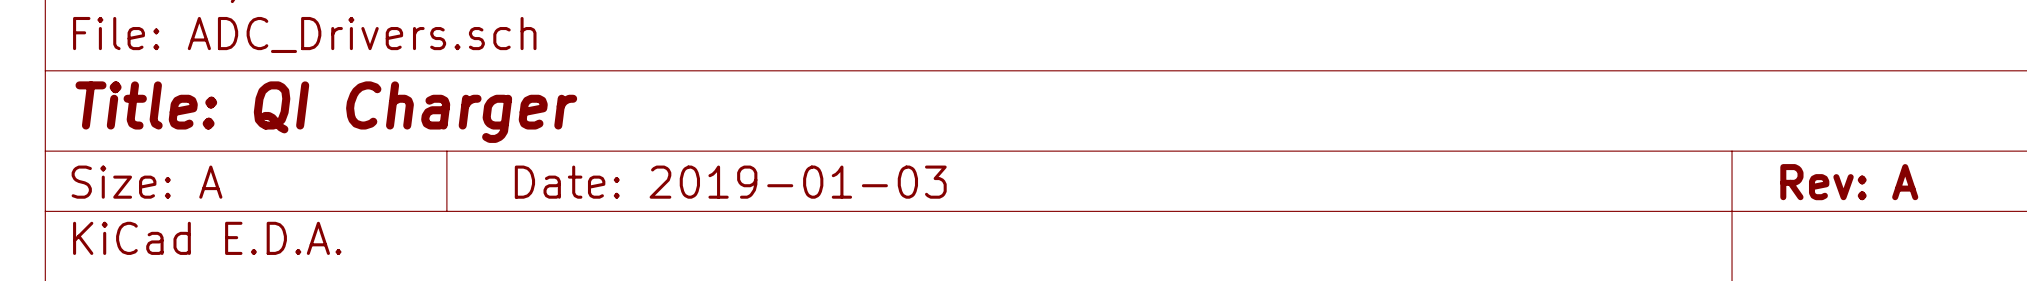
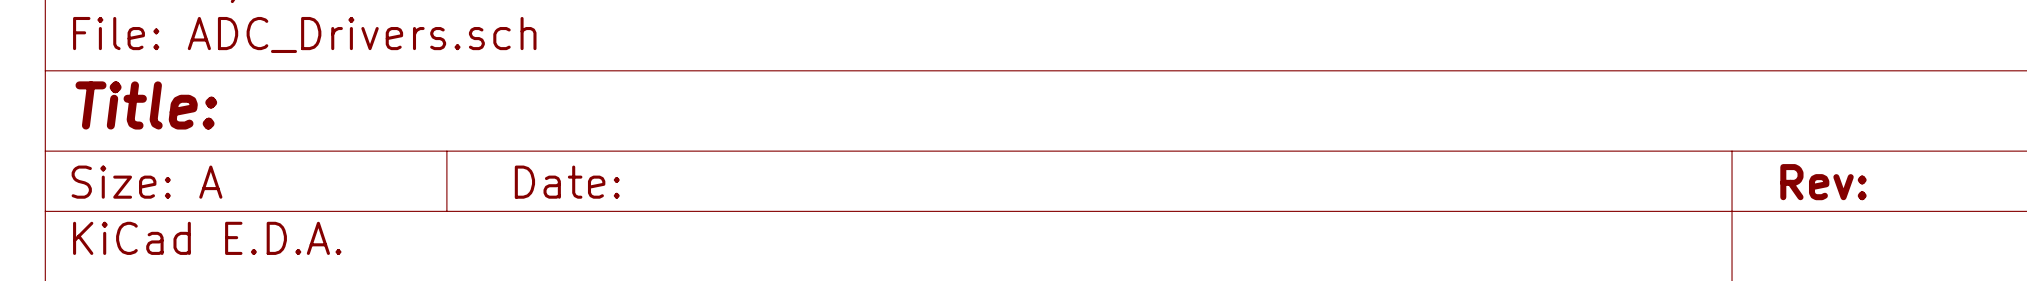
title block: Title: QI Charger (326, 112) -> Title: (146, 105)
title block: Date: 2019-01-03 (730, 182) -> Date: (567, 182)
title block: Rev: A (1849, 182) -> Rev: (1823, 182)

